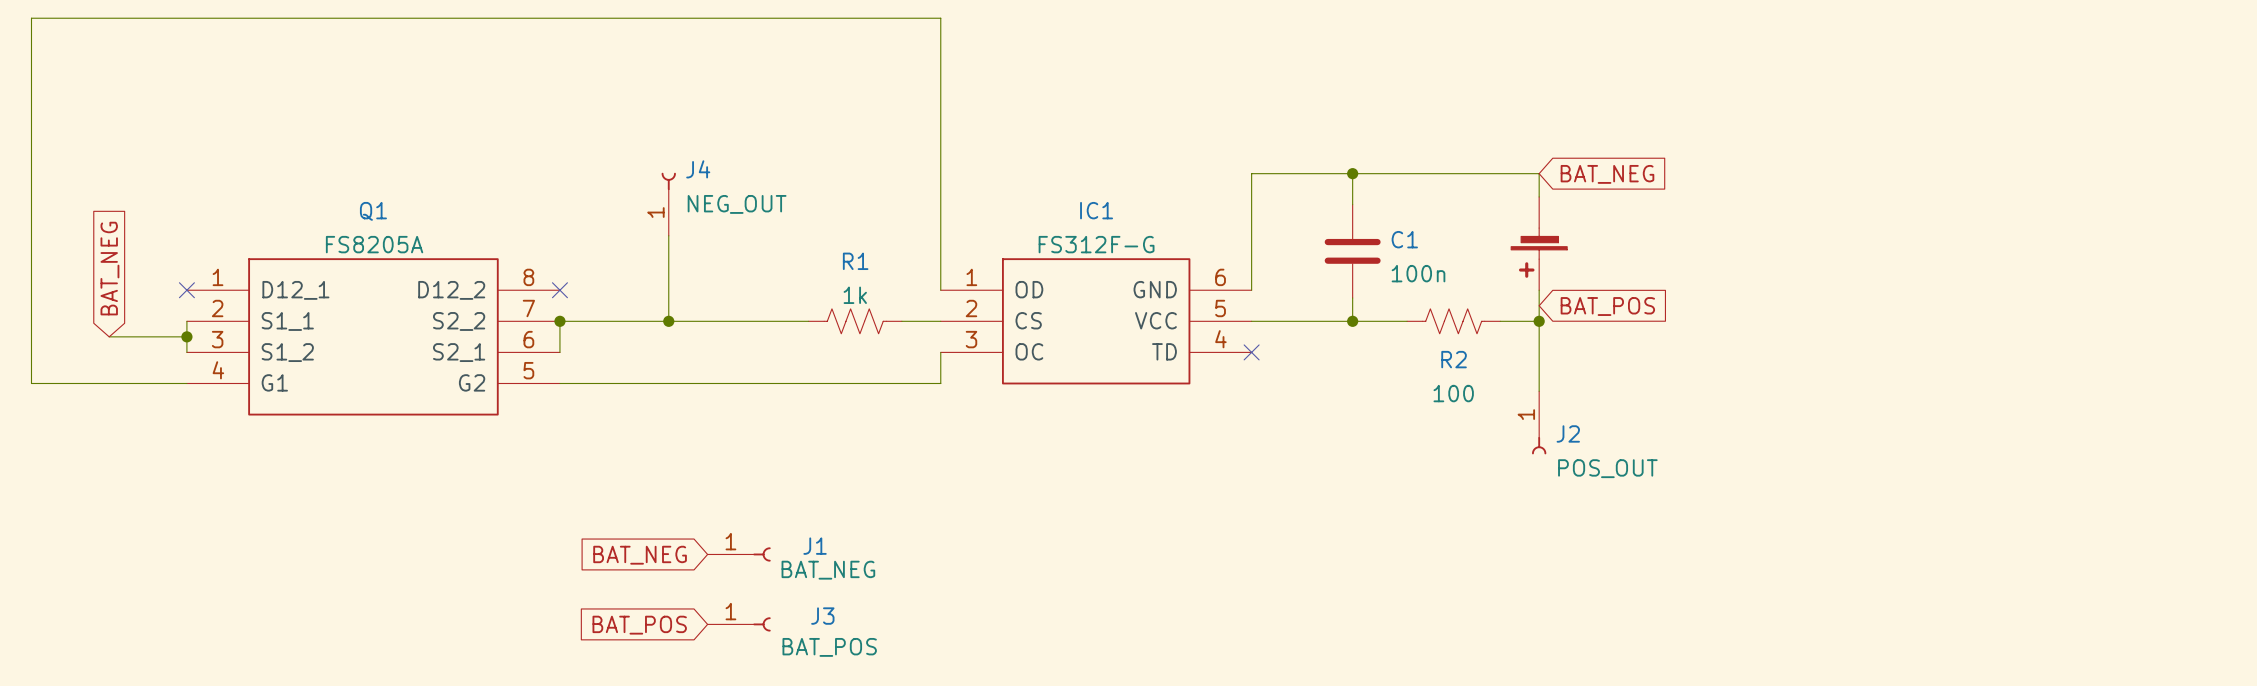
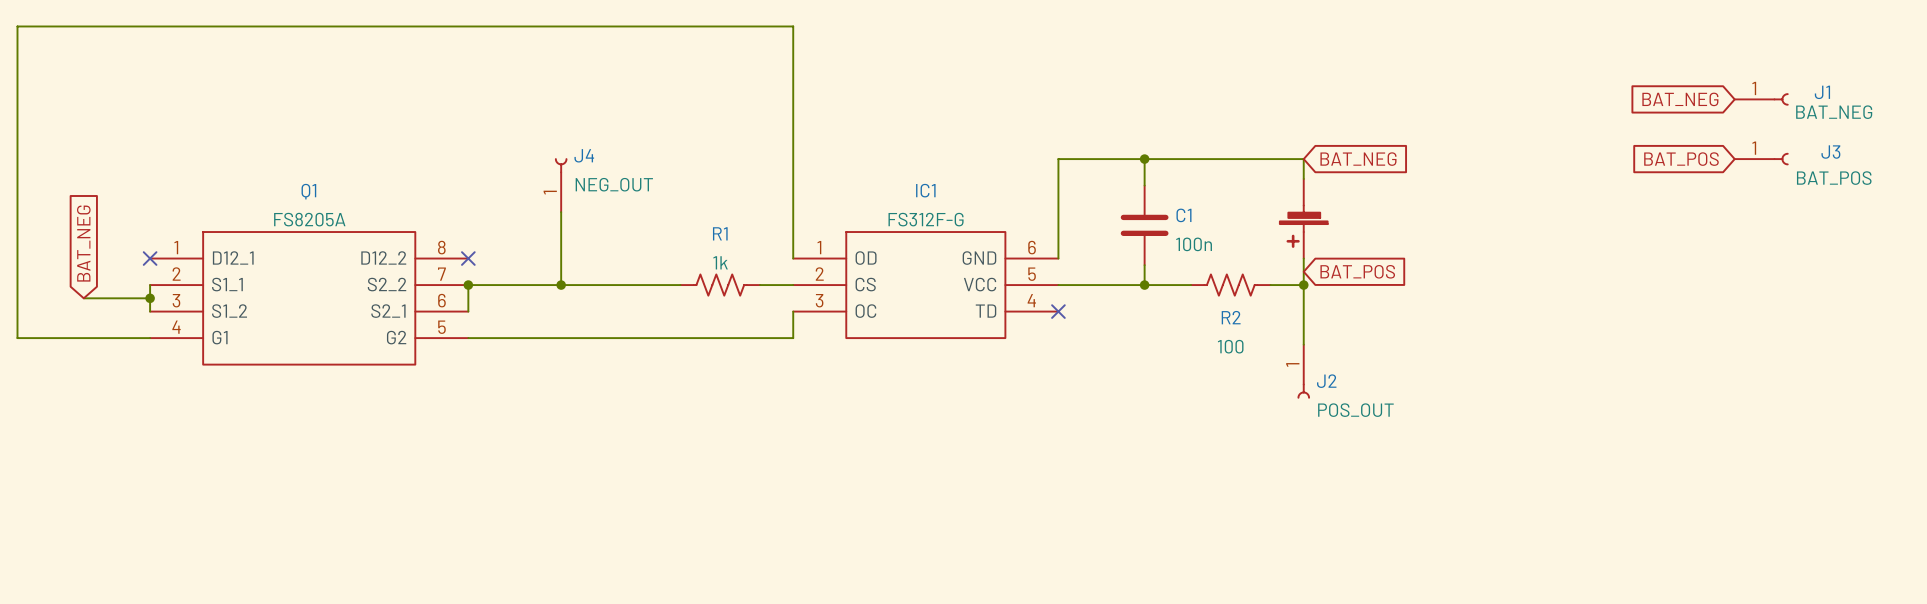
global label: none -> BAT_NEG (1680, 99)
global label: none -> BAT_POS (1681, 159)
J1 position: (739, 554) -> (1761, 99)
global label: BAT_NEG (640, 555) -> none
J3 position: (739, 624) -> (1761, 159)
global label: BAT_POS (639, 625) -> none

